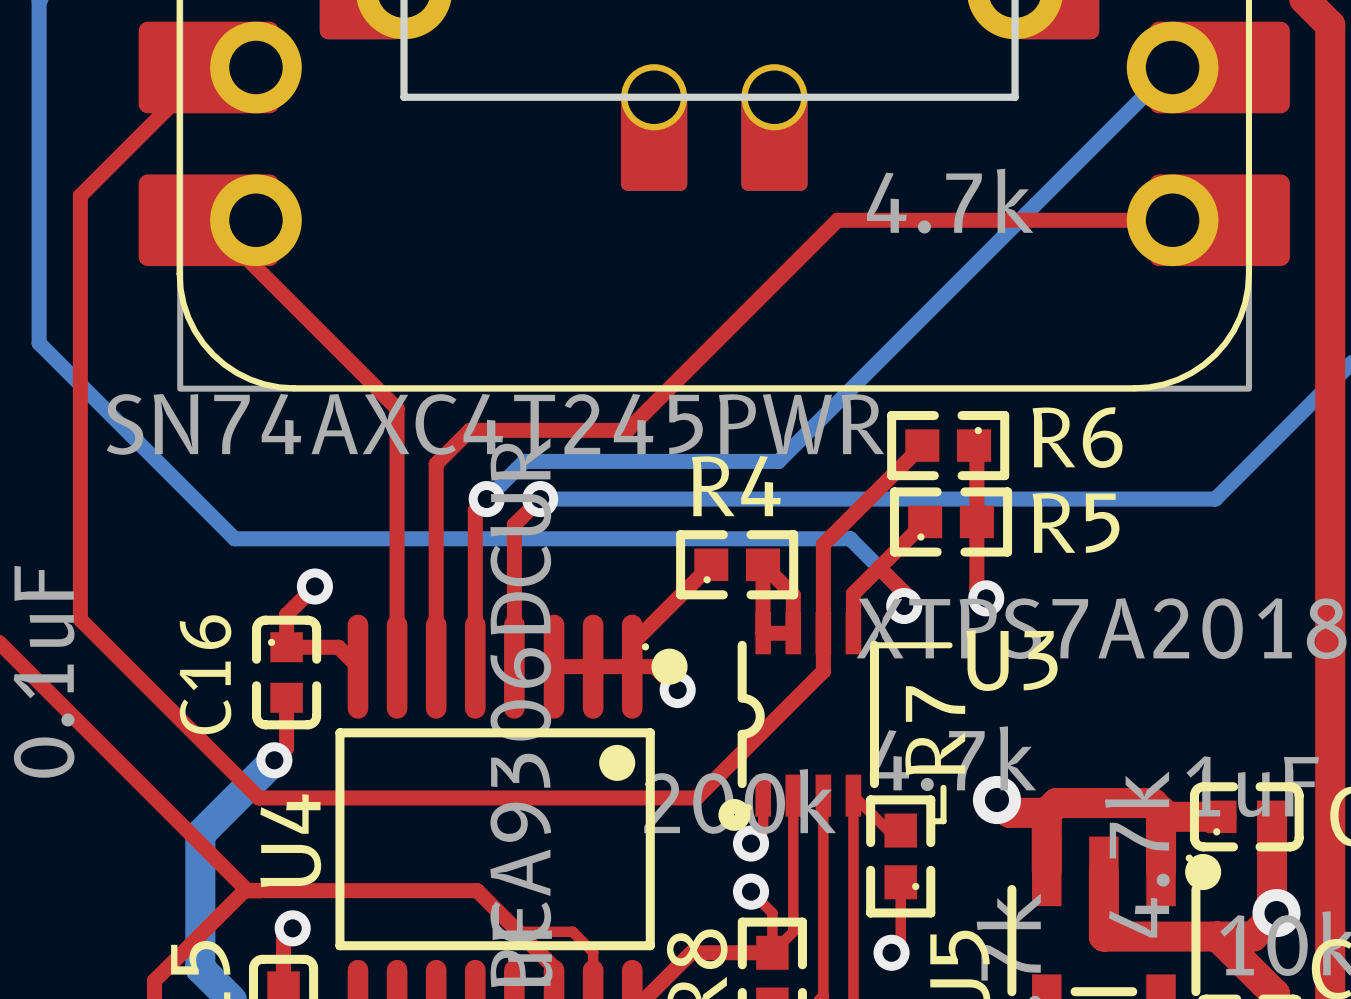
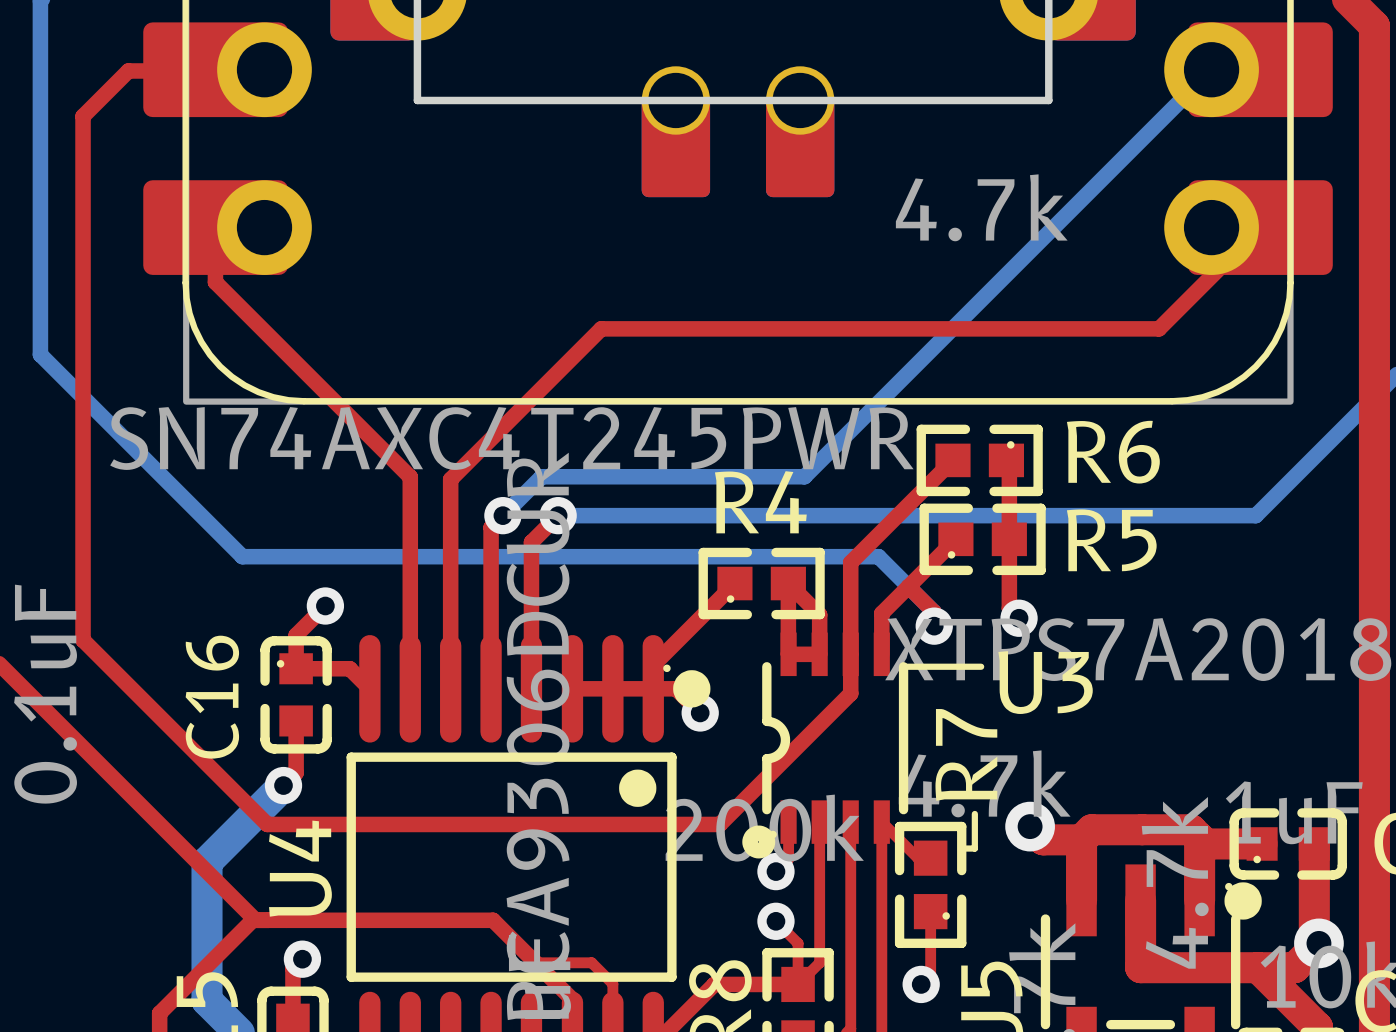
top track: (207, 68) (80, 195) -> (214, 70) (128, 70) (83, 116) (83, 202)
top track: (208, 220) (397, 408) (397, 461) -> (215, 227) (215, 282) (410, 477)
top track: (1219, 220) (837, 220) (627, 430) (469, 430) -> (1260, 227) (1159, 328) (601, 328) (485, 444)

